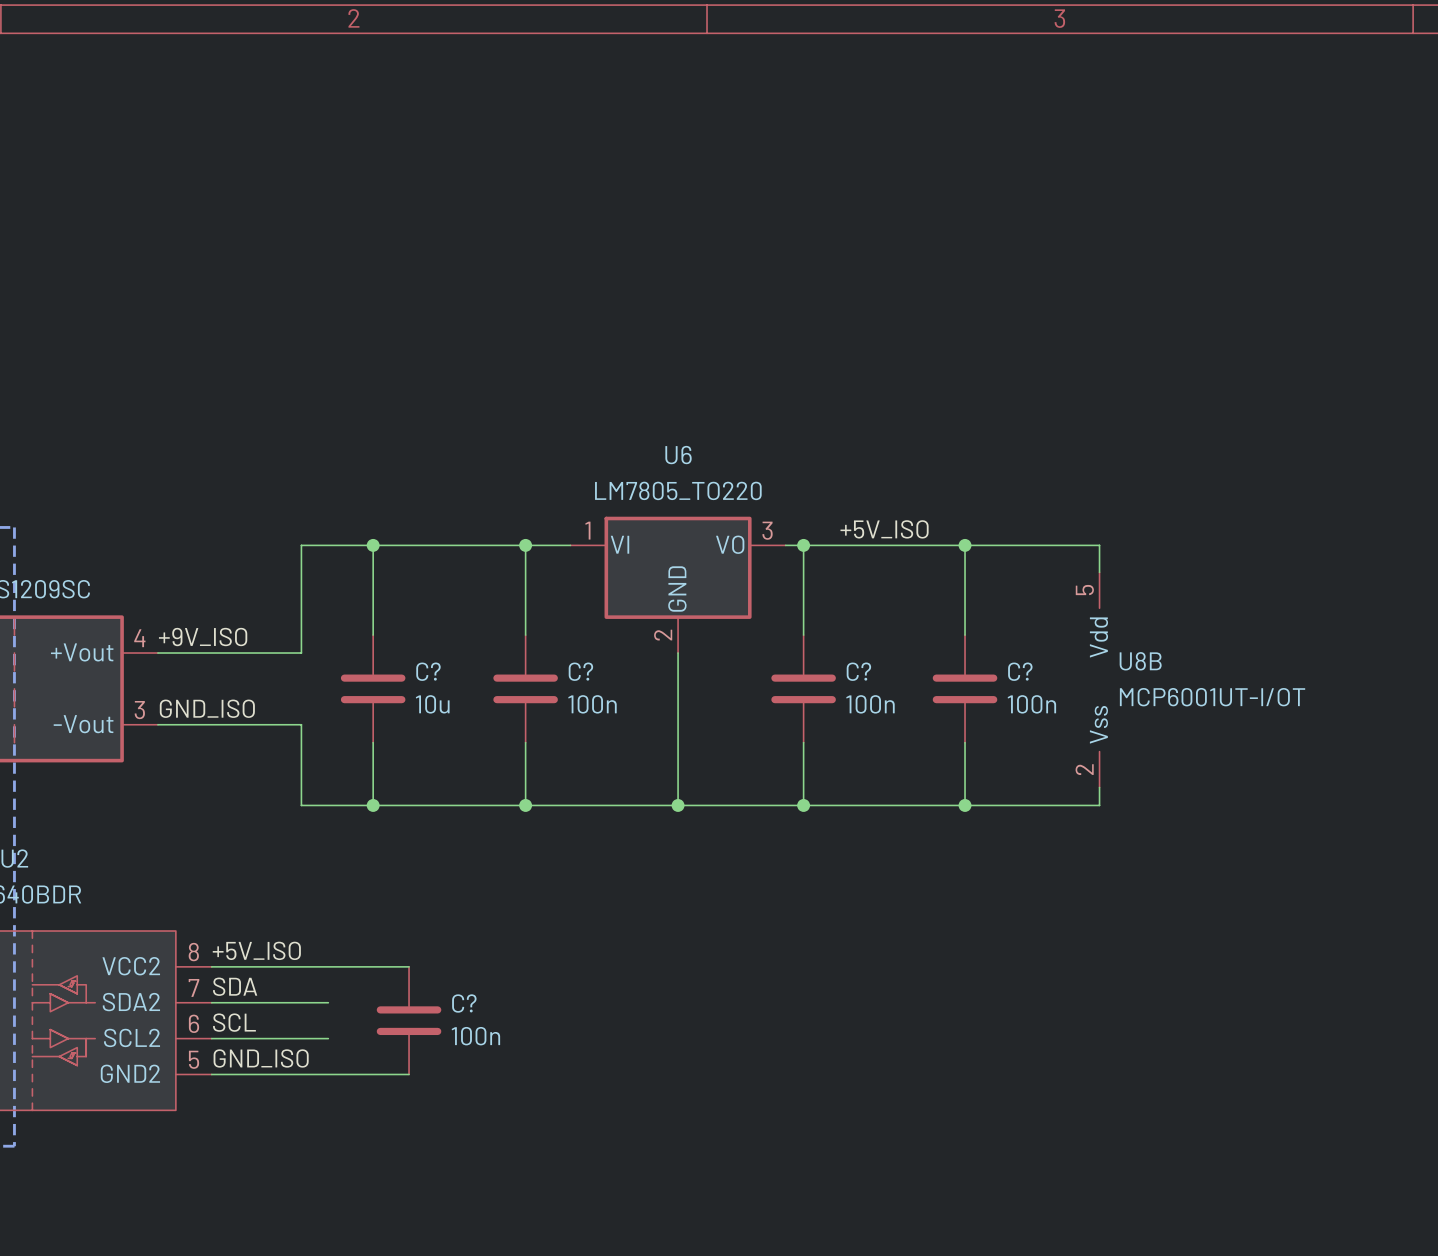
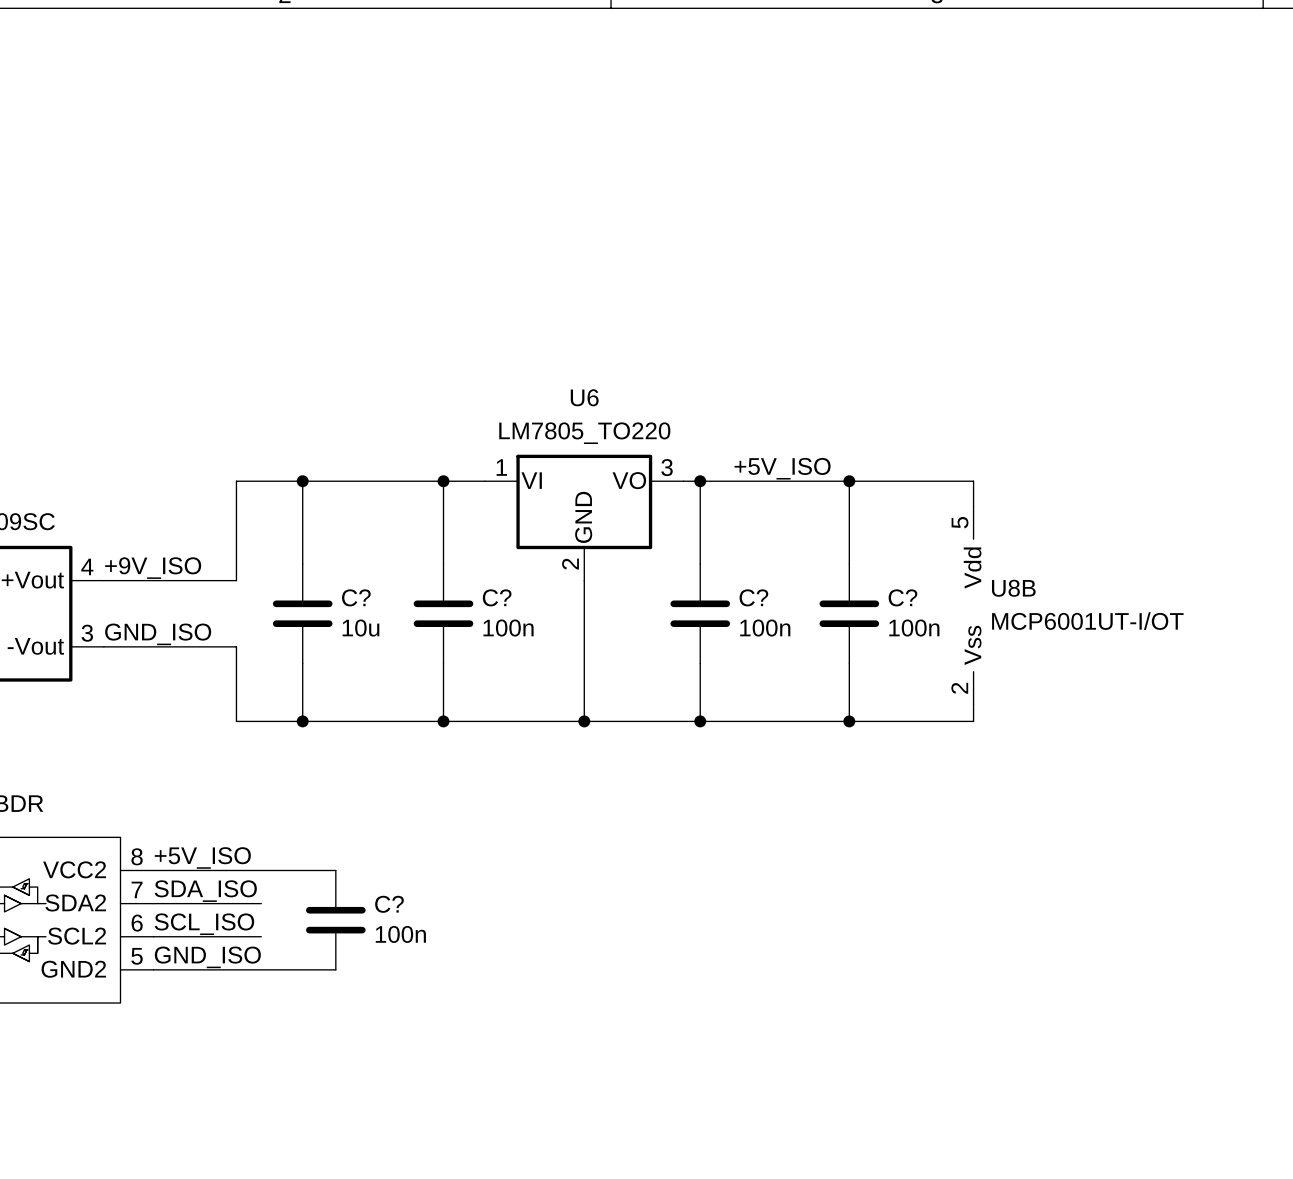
label: SDA (235, 986) -> SDA_ISO (205, 891)
label: SCL (234, 1022) -> SCL_ISO (204, 924)

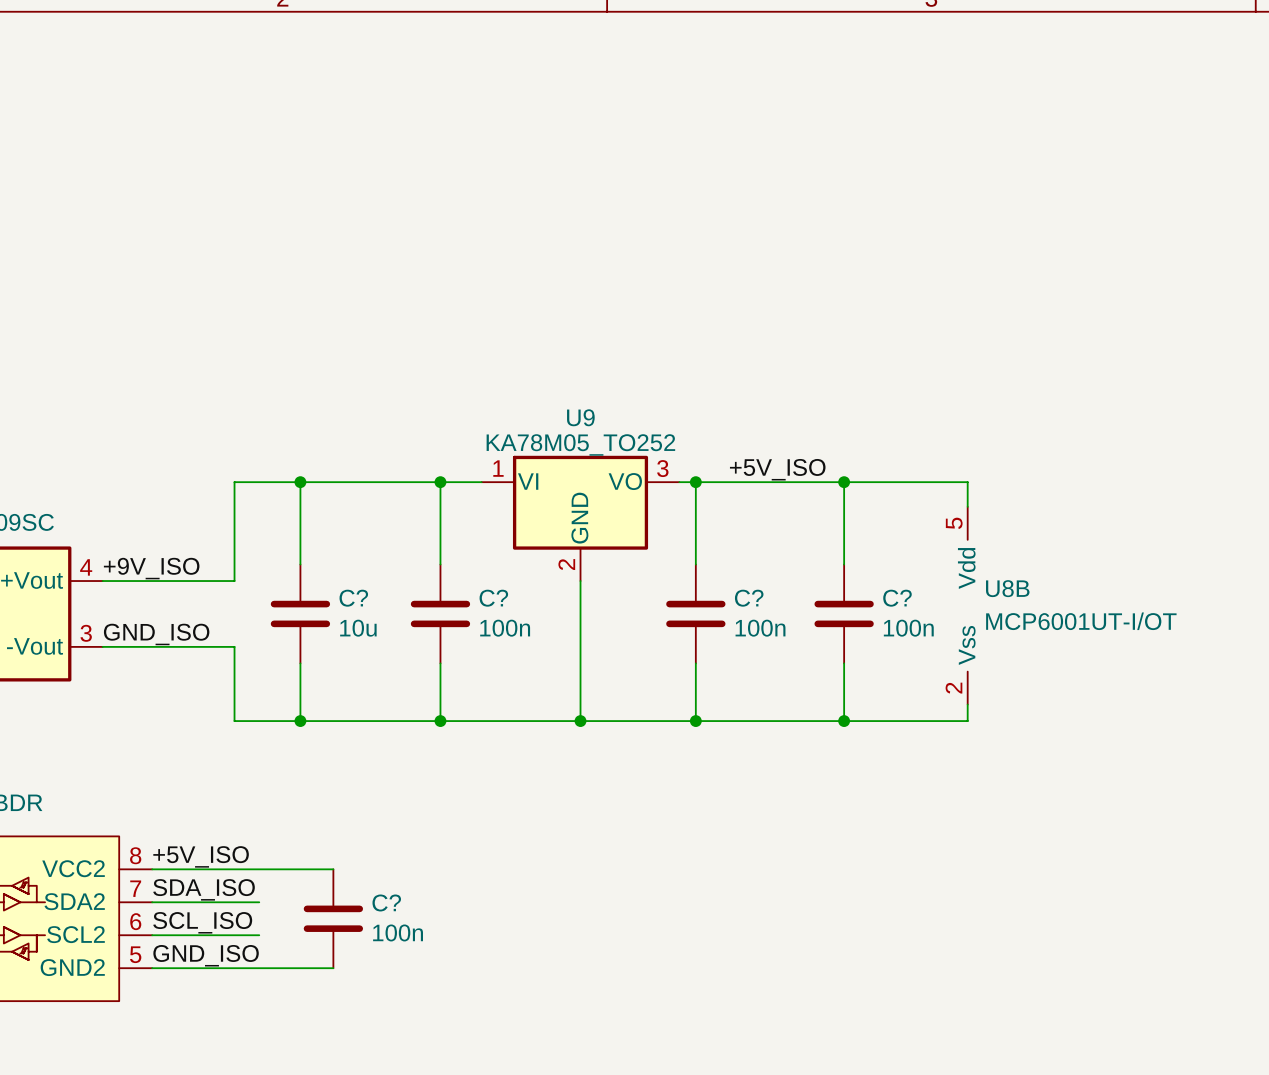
U6 name: U6 (584, 397) -> U9 (580, 417)
U6 value: LM7805_TO220 (584, 433) -> KA78M05_TO252 (580, 444)

